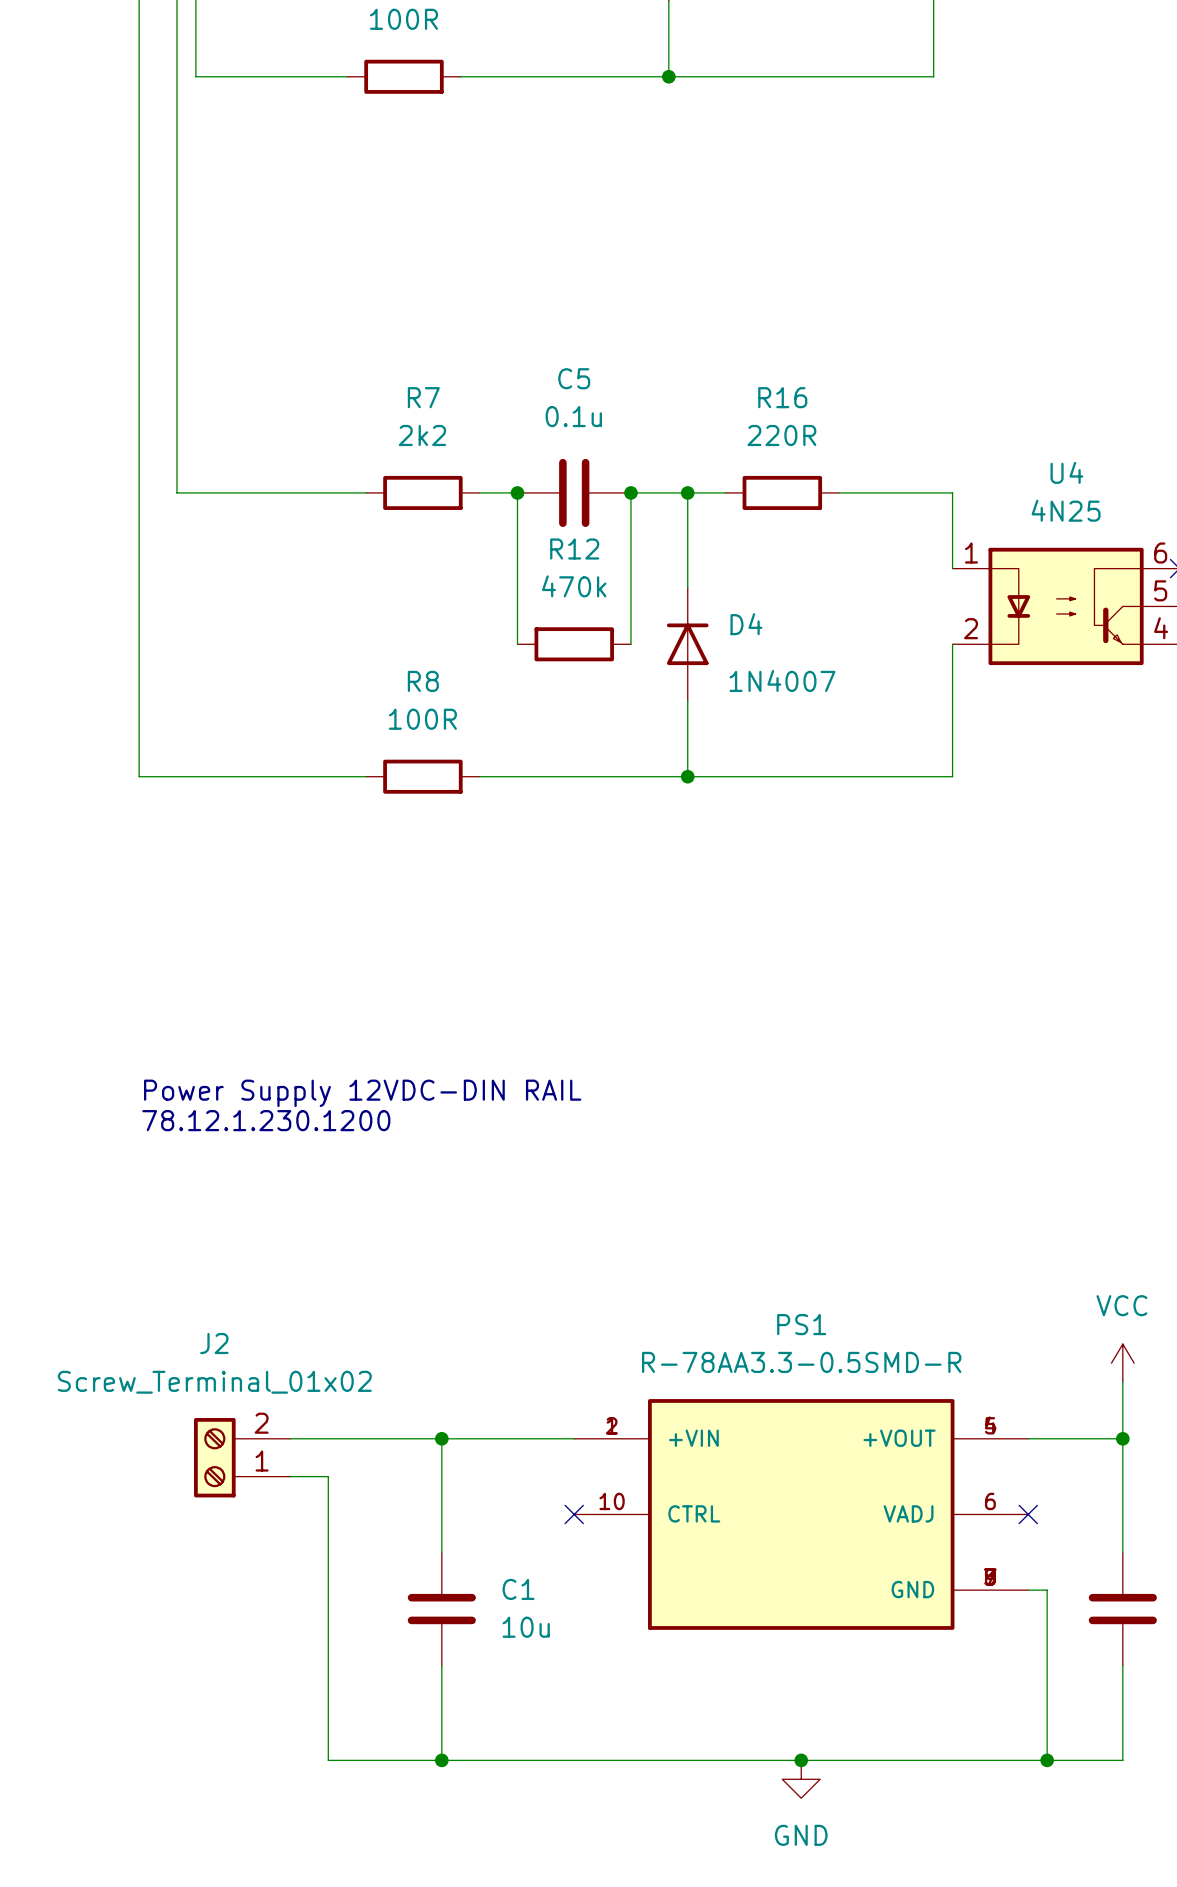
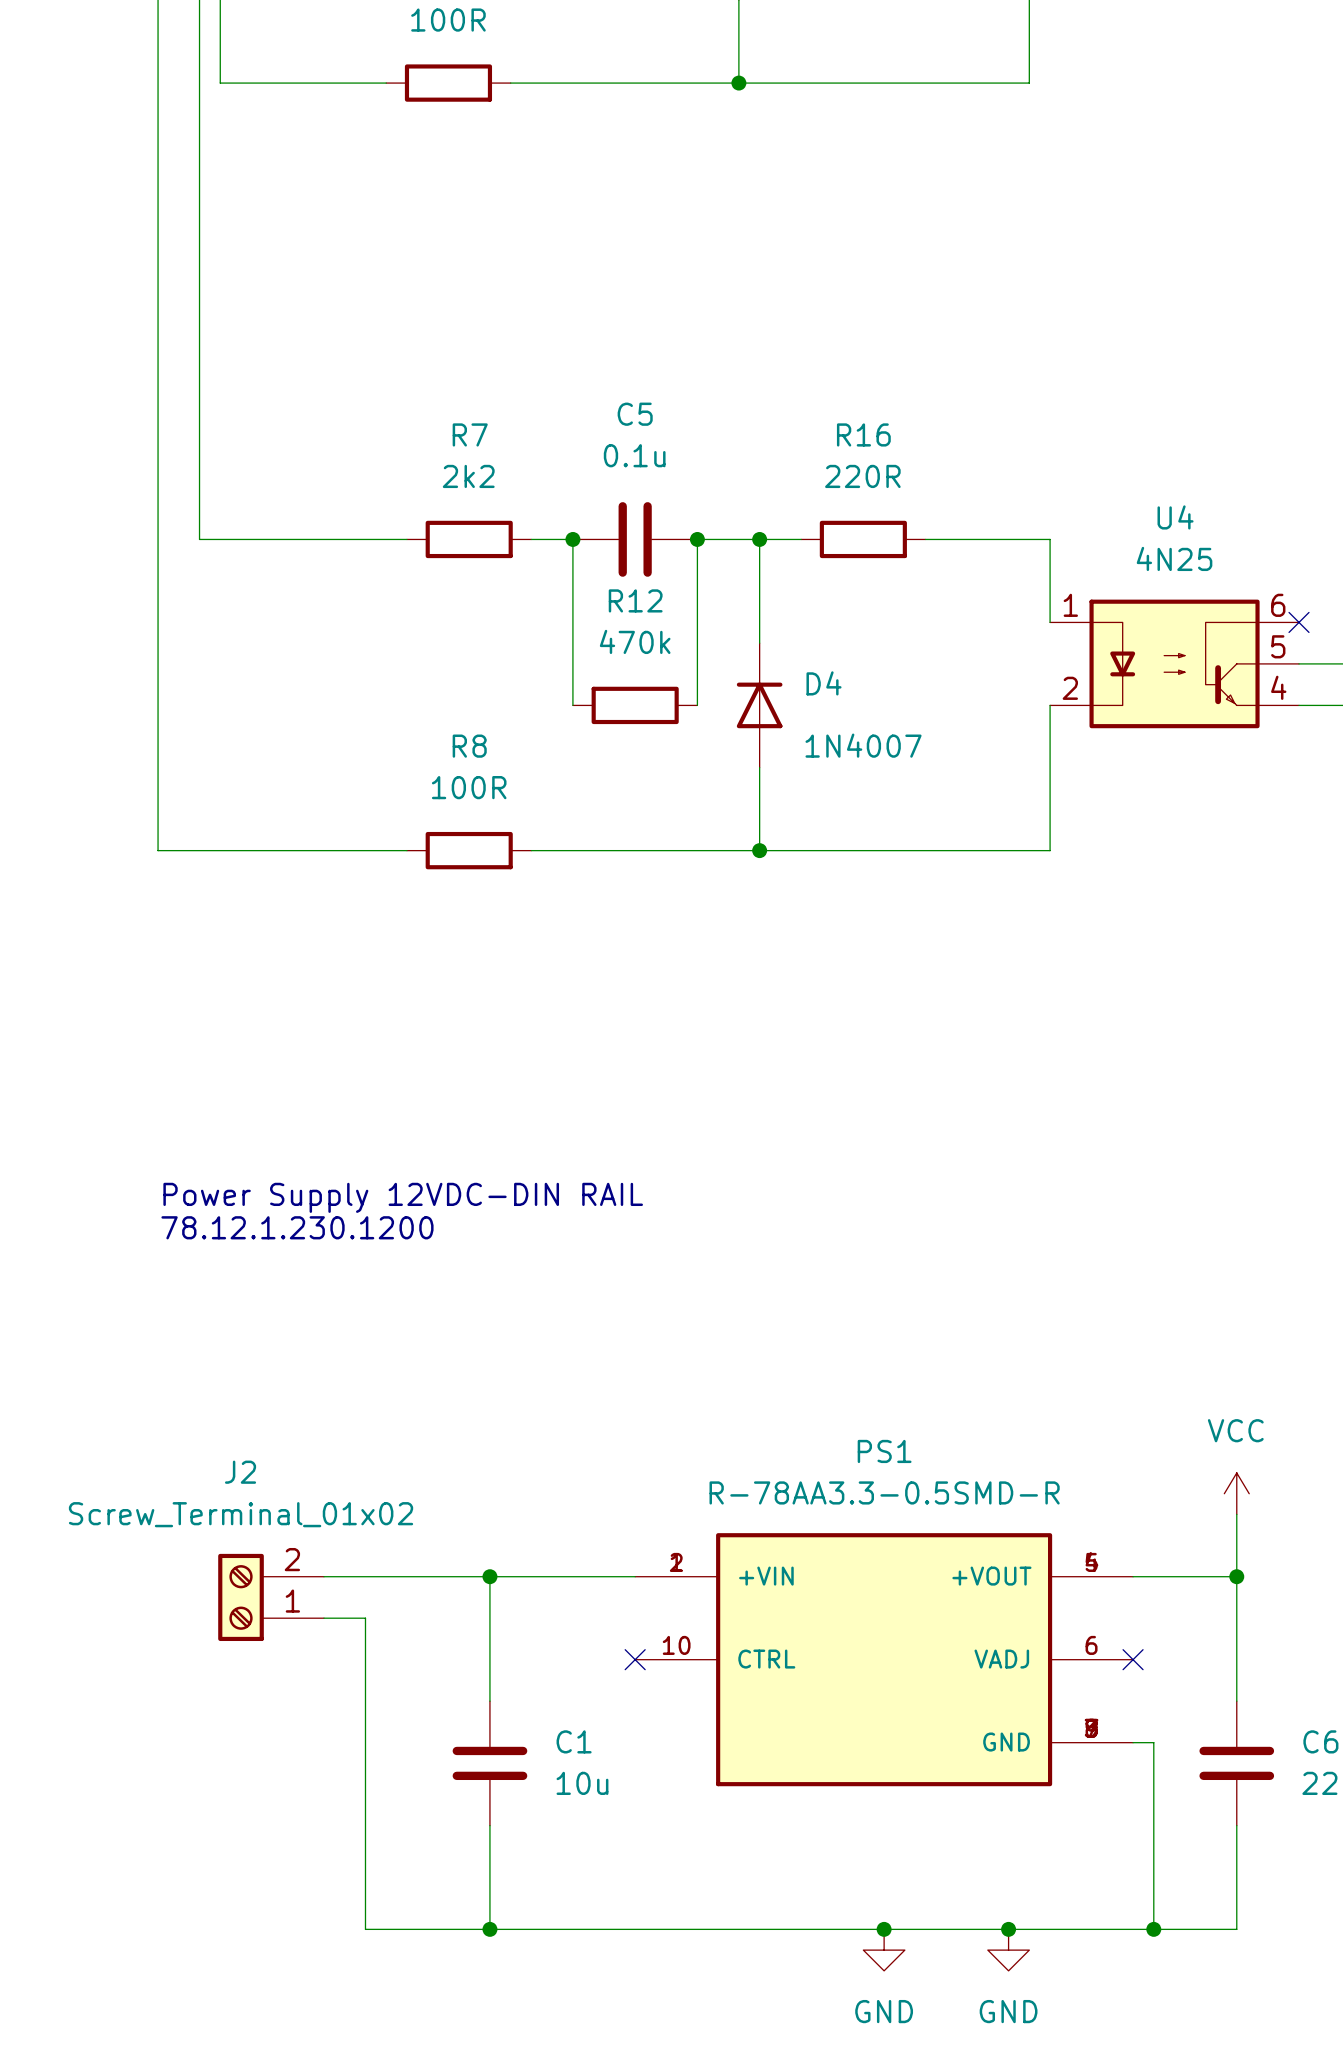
junction: none -> (1008, 1929)
power symbol: none -> GND (1008, 1950)

